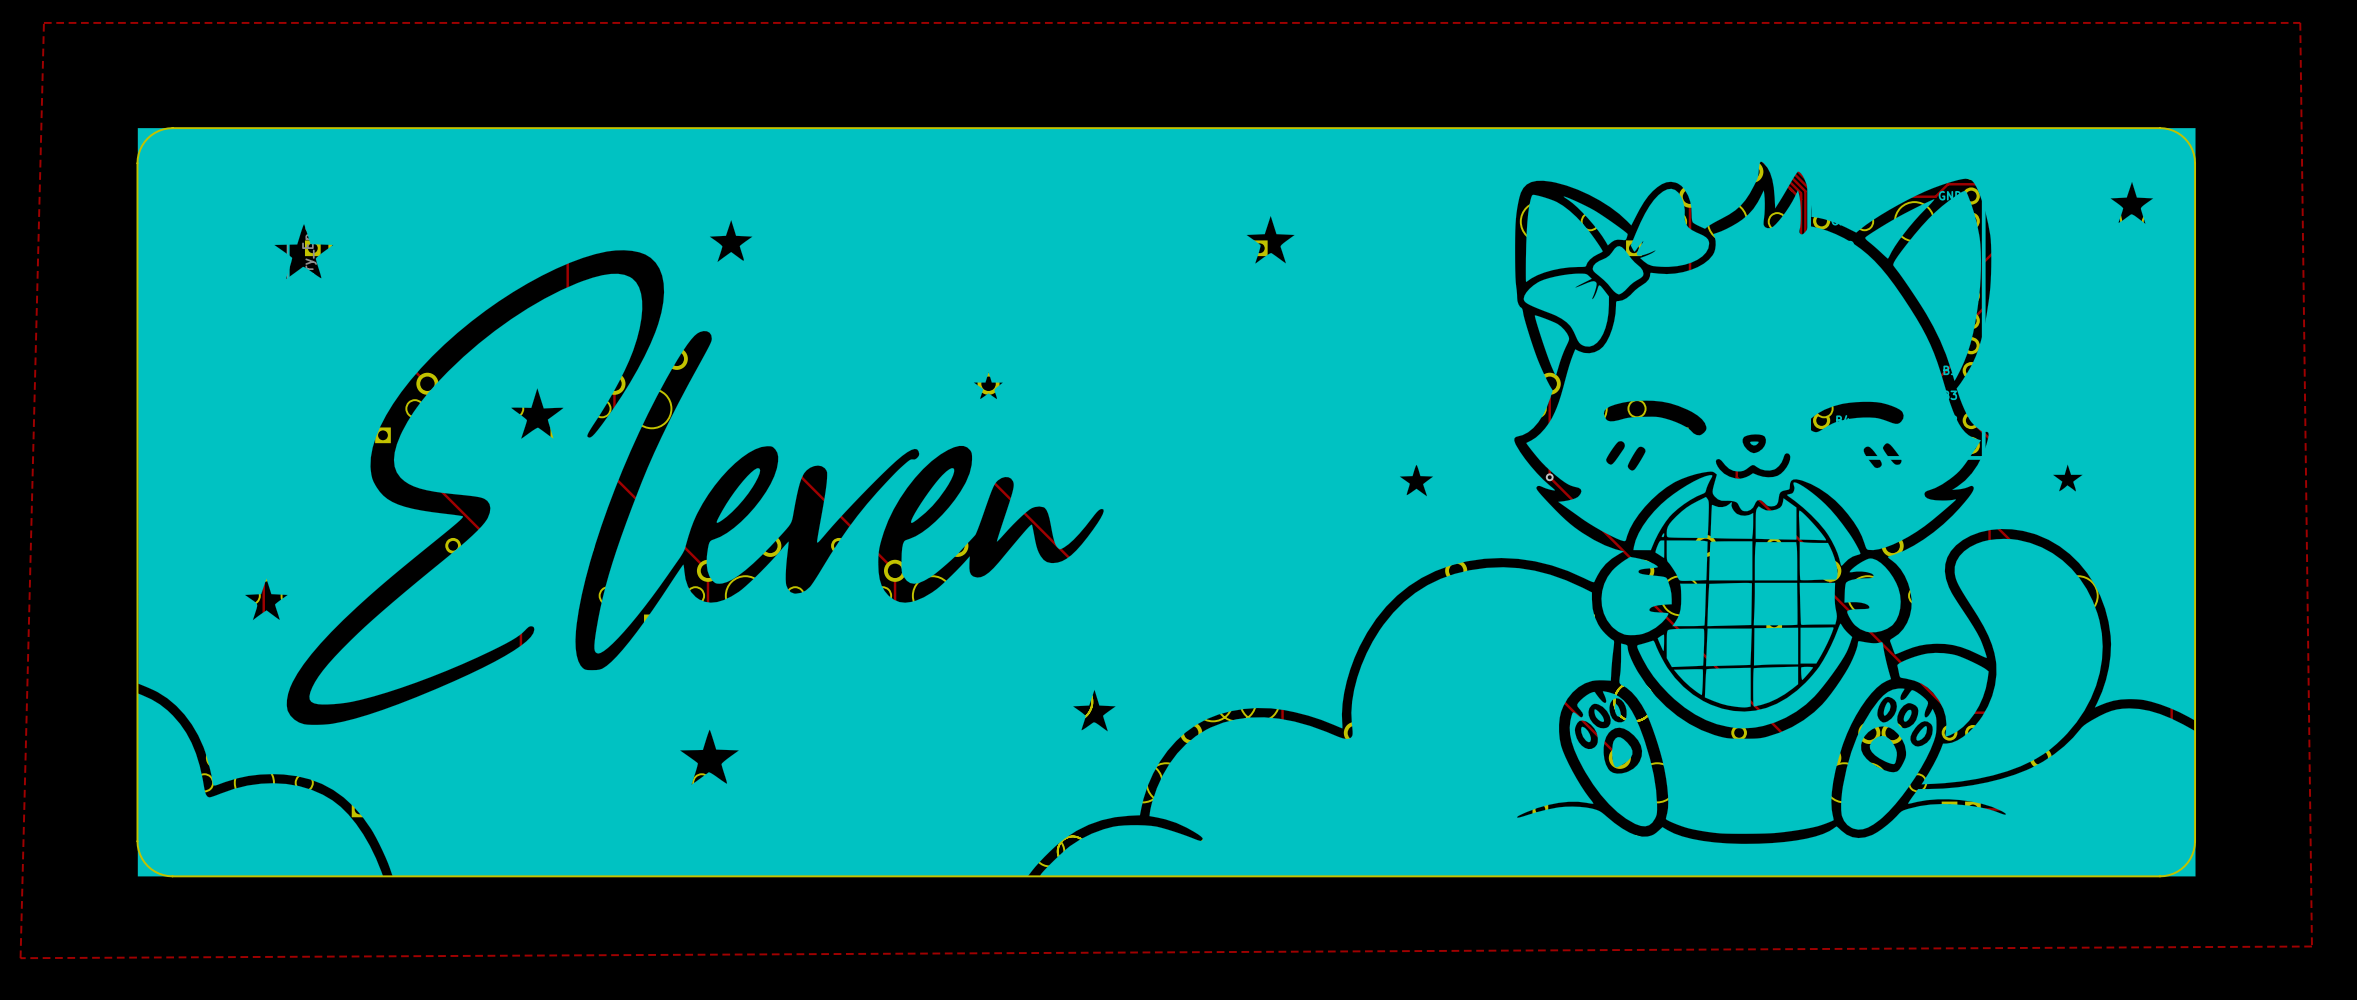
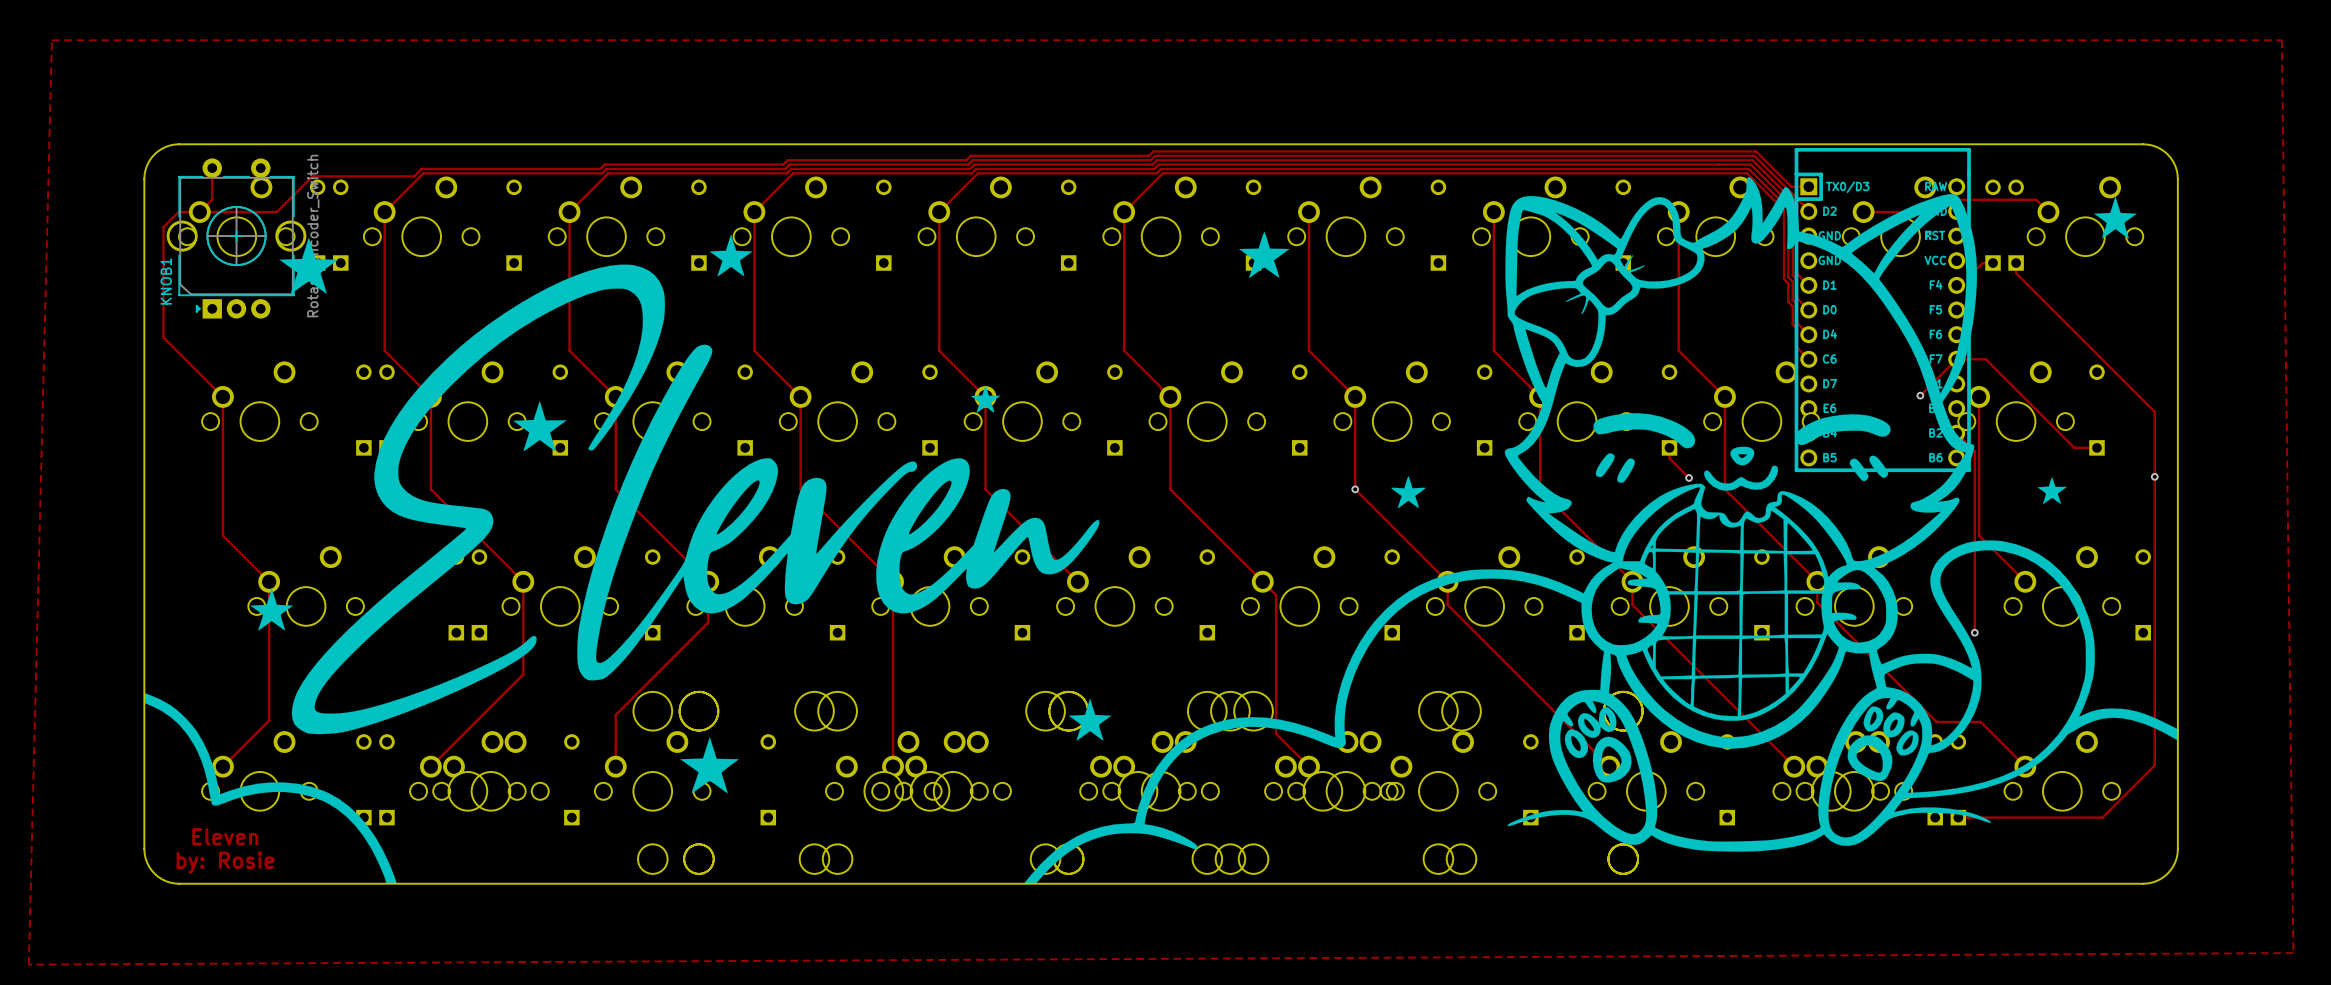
drawing: [137, 128, 2196, 877] -> none
drawing: none -> [144, 177, 2179, 884]

